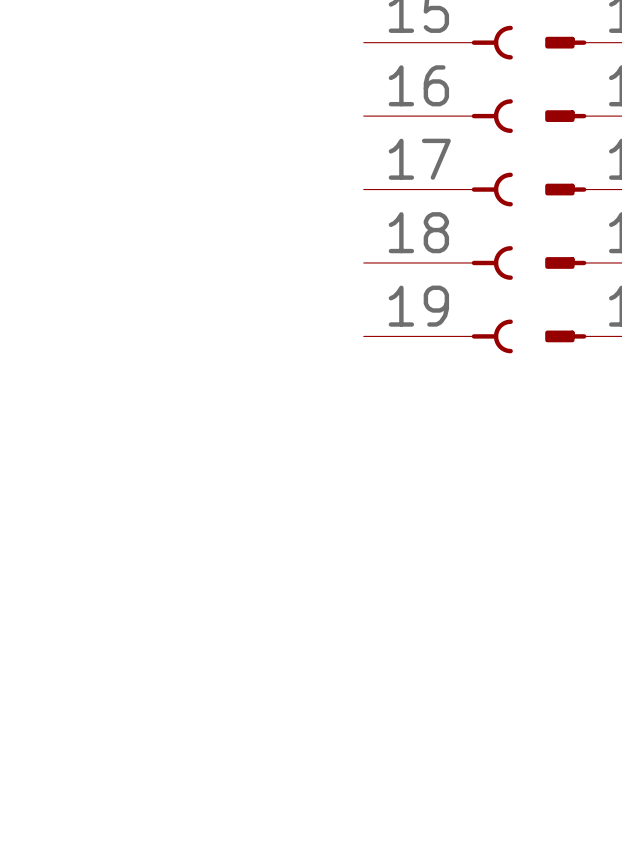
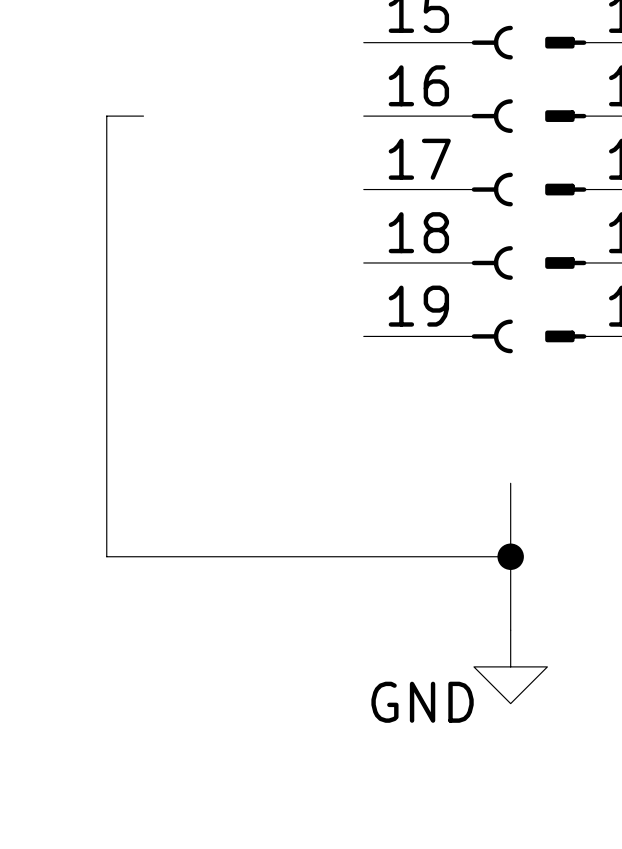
wire: none -> (143, 116) (106, 116) (106, 556) (510, 556)
wire: none -> (510, 483) (510, 630)
junction: none -> (510, 556)
power symbol: none -> GND (510, 666)

